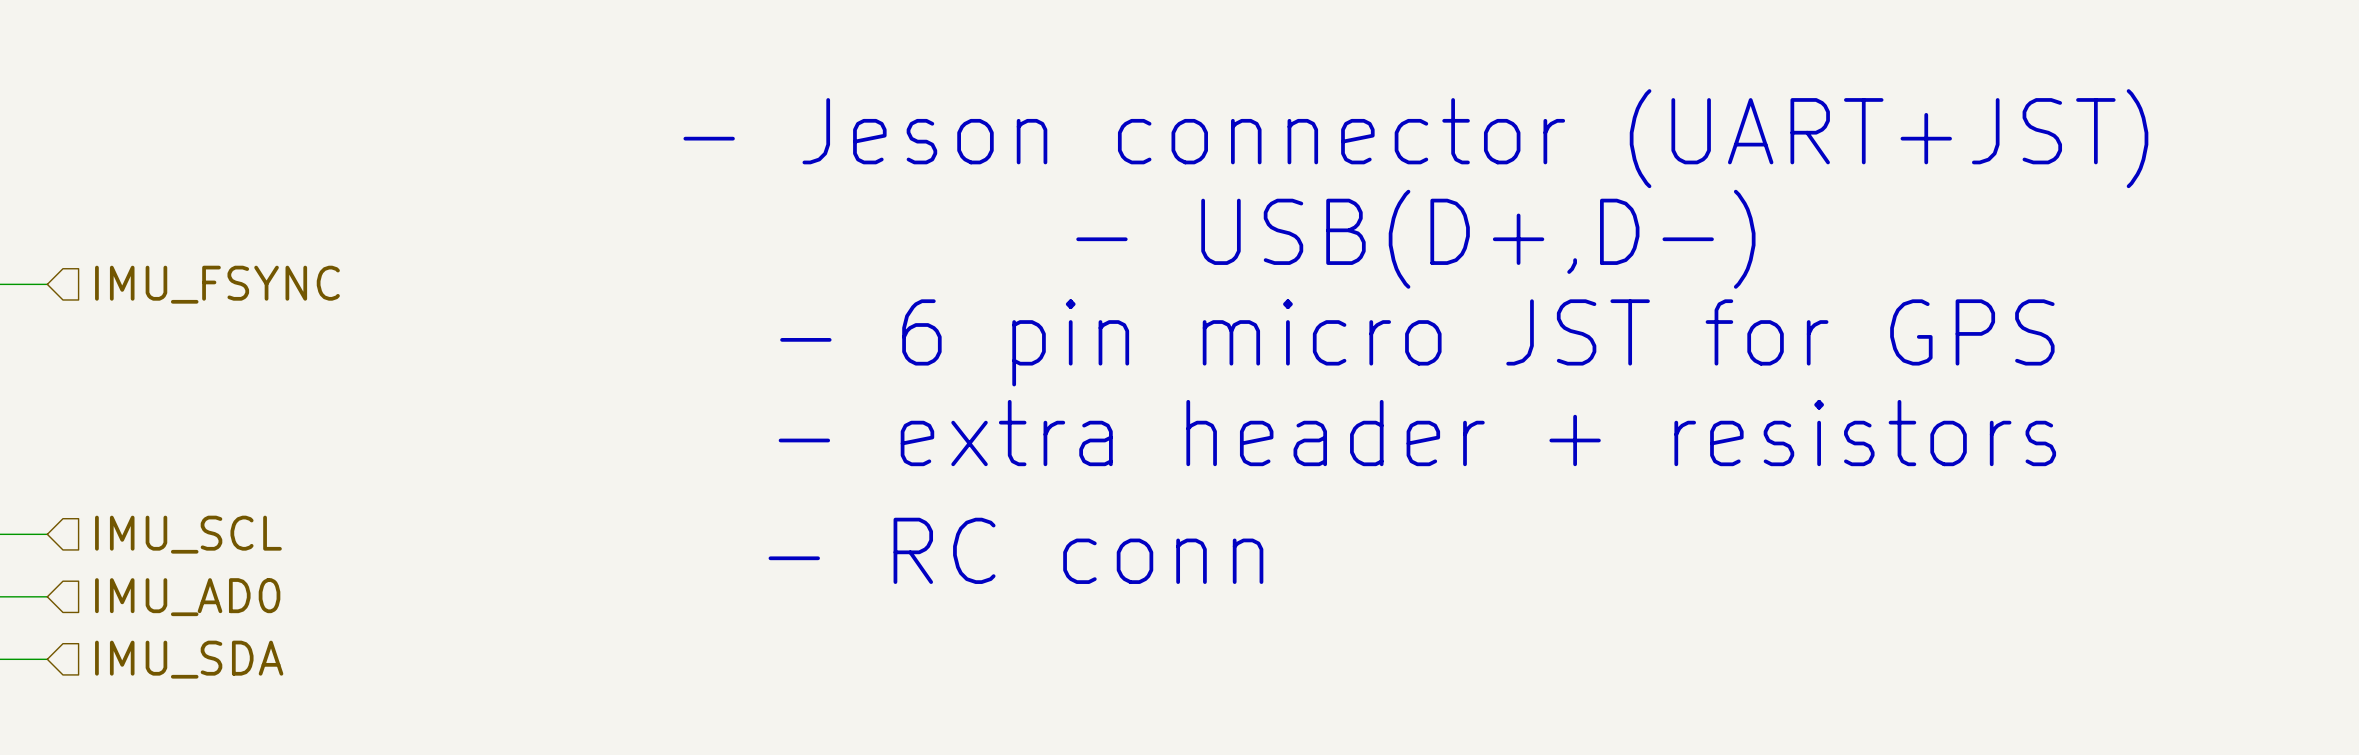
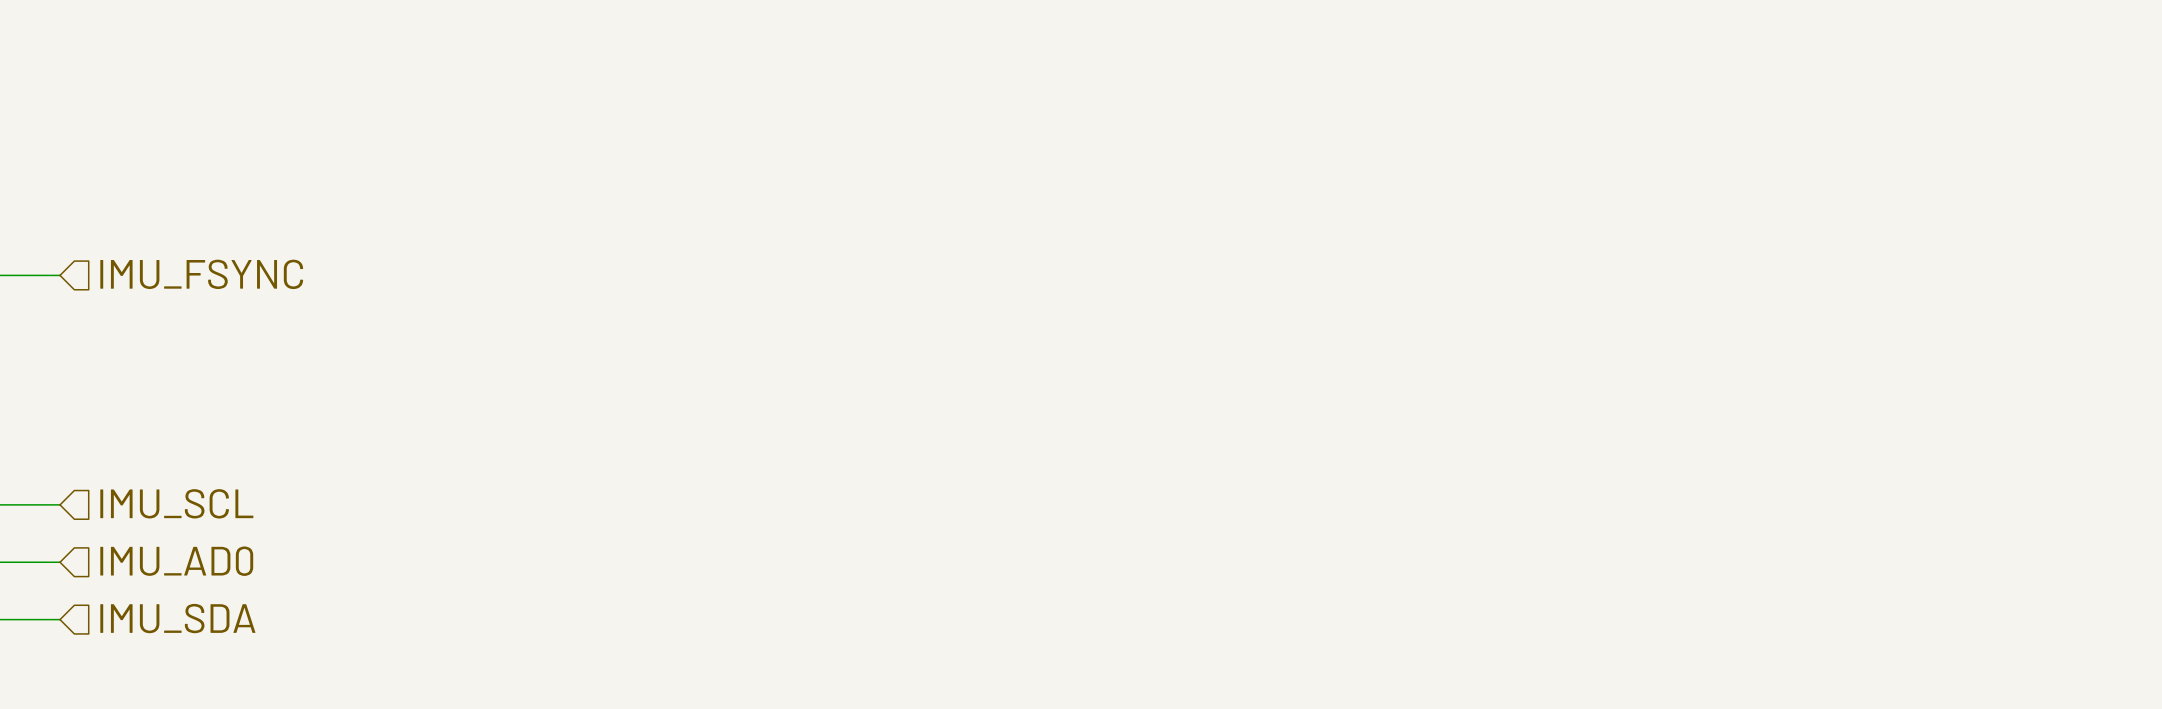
text: - Jeson connector (UART+JST) (1415, 138) -> none
text: - USB(D+,D-) (1415, 239) -> none
text: - 6 pin micro JST for GPS (1417, 342) -> none
text: - extra header + resistors (1417, 433) -> none
text: - RC conn (1015, 550) -> none

